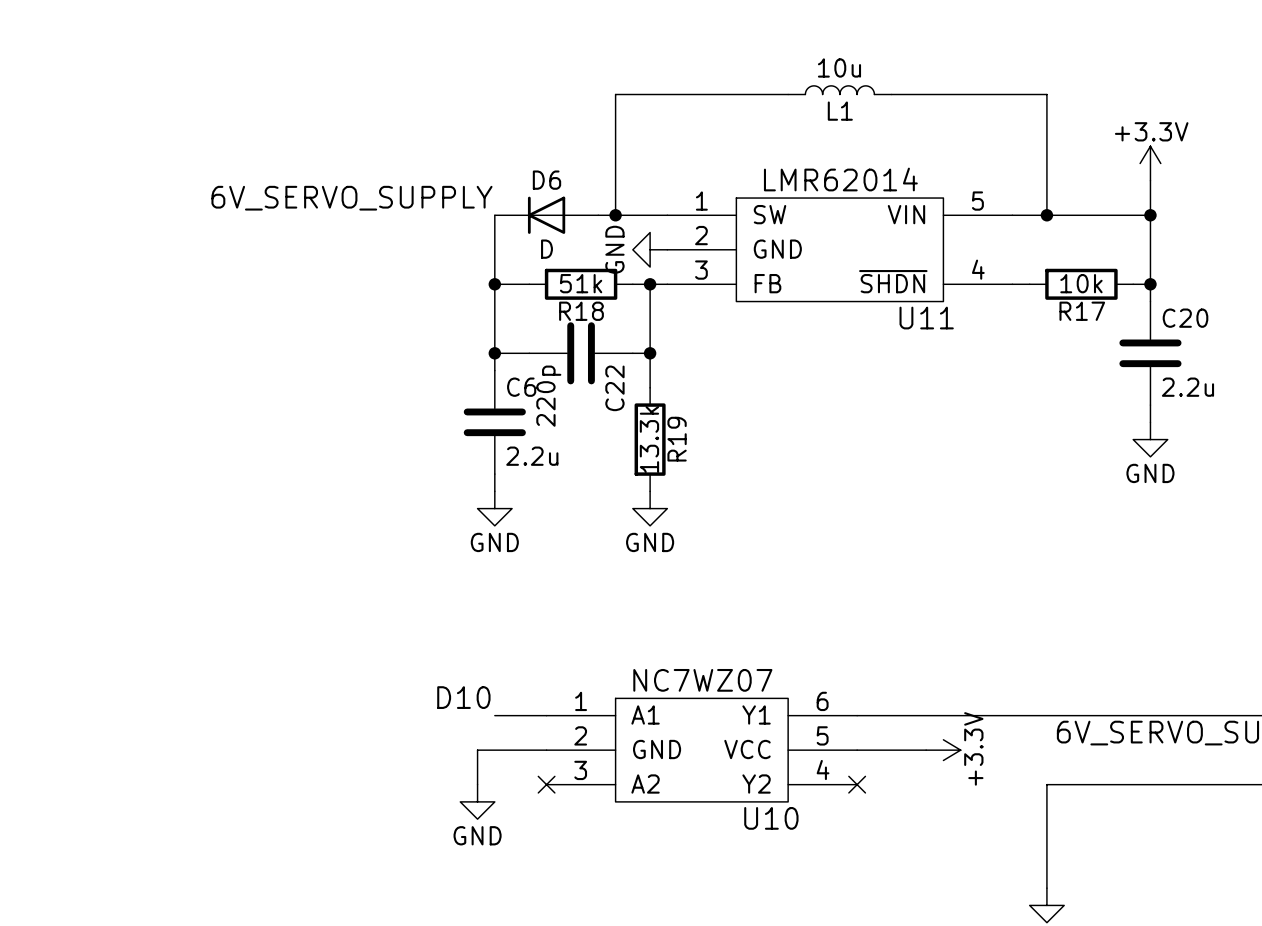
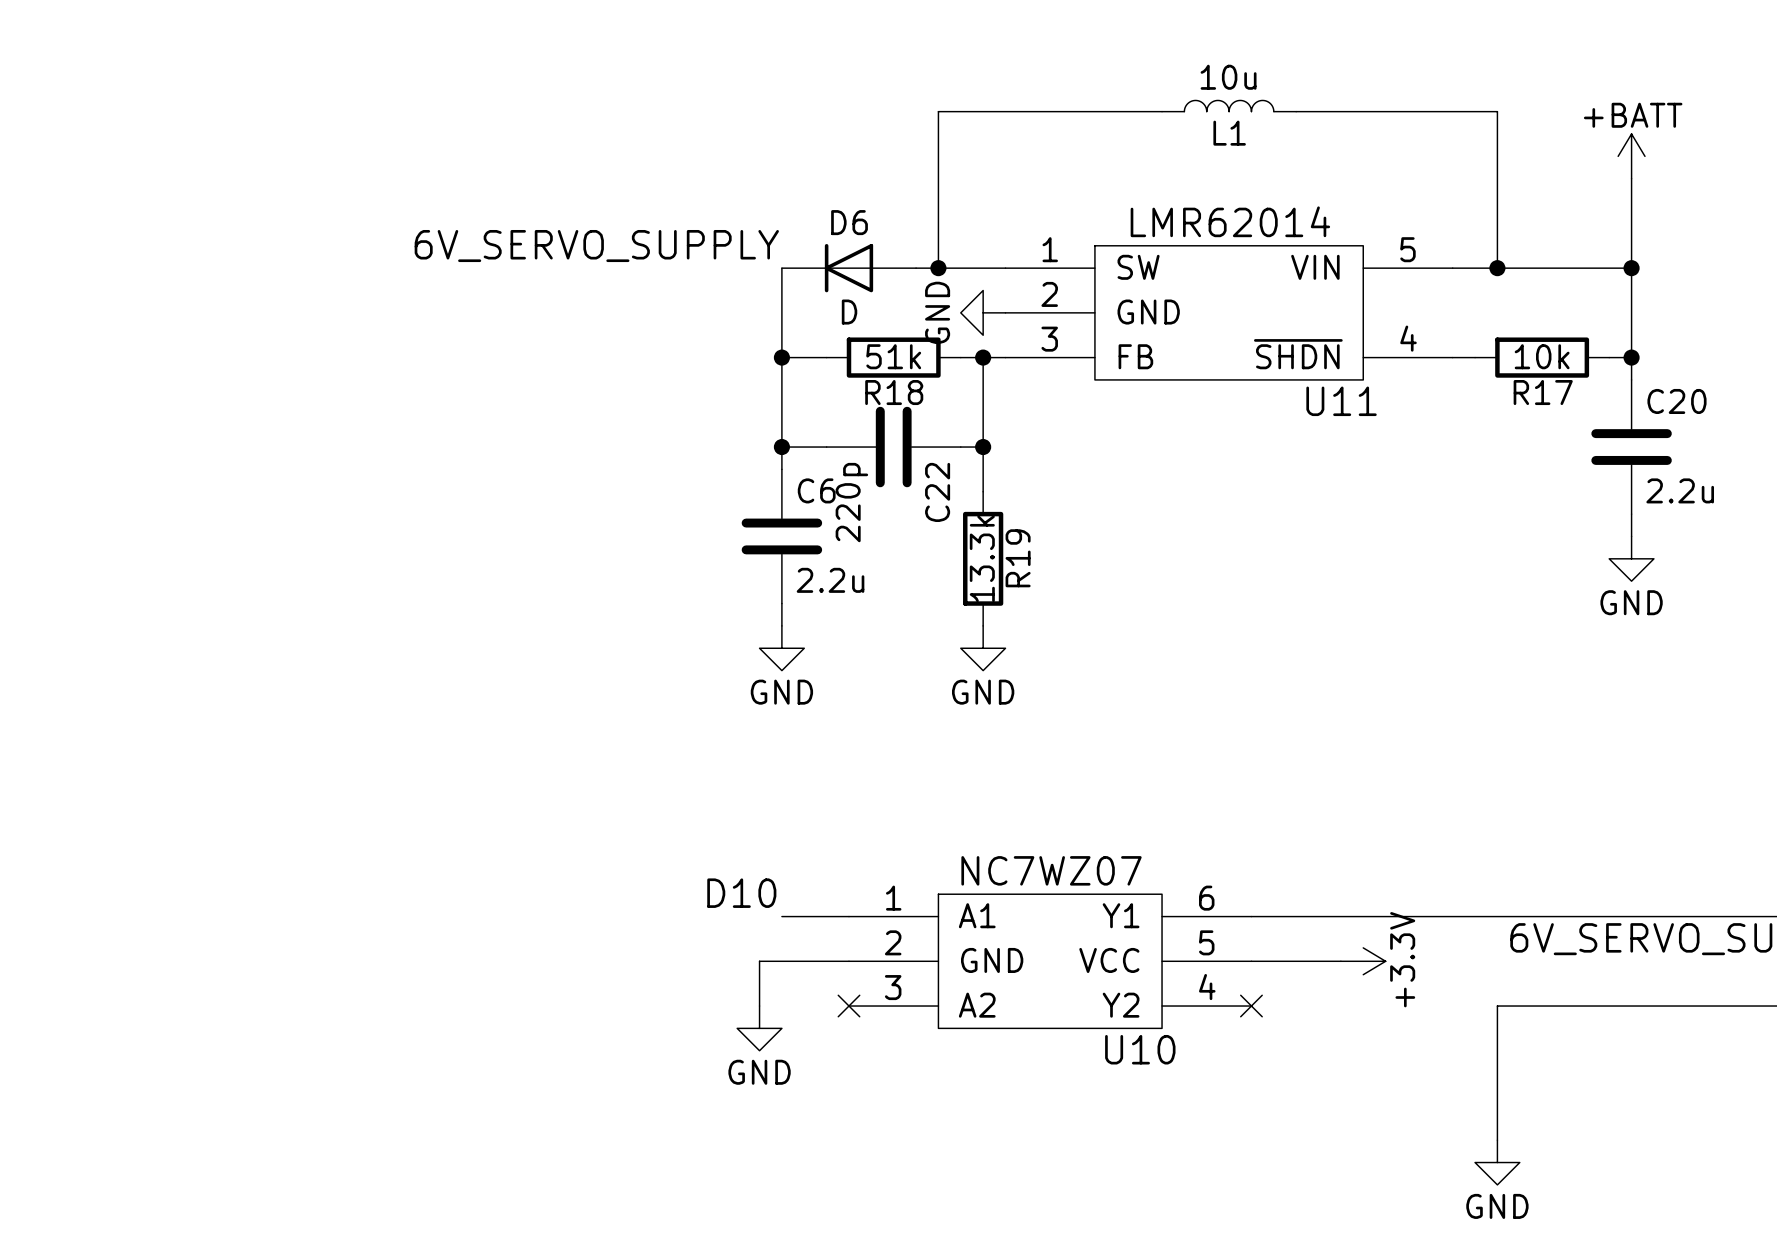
power symbol: none -> +BATT (1631, 156)
power symbol: +3.3V (1150, 163) -> none

